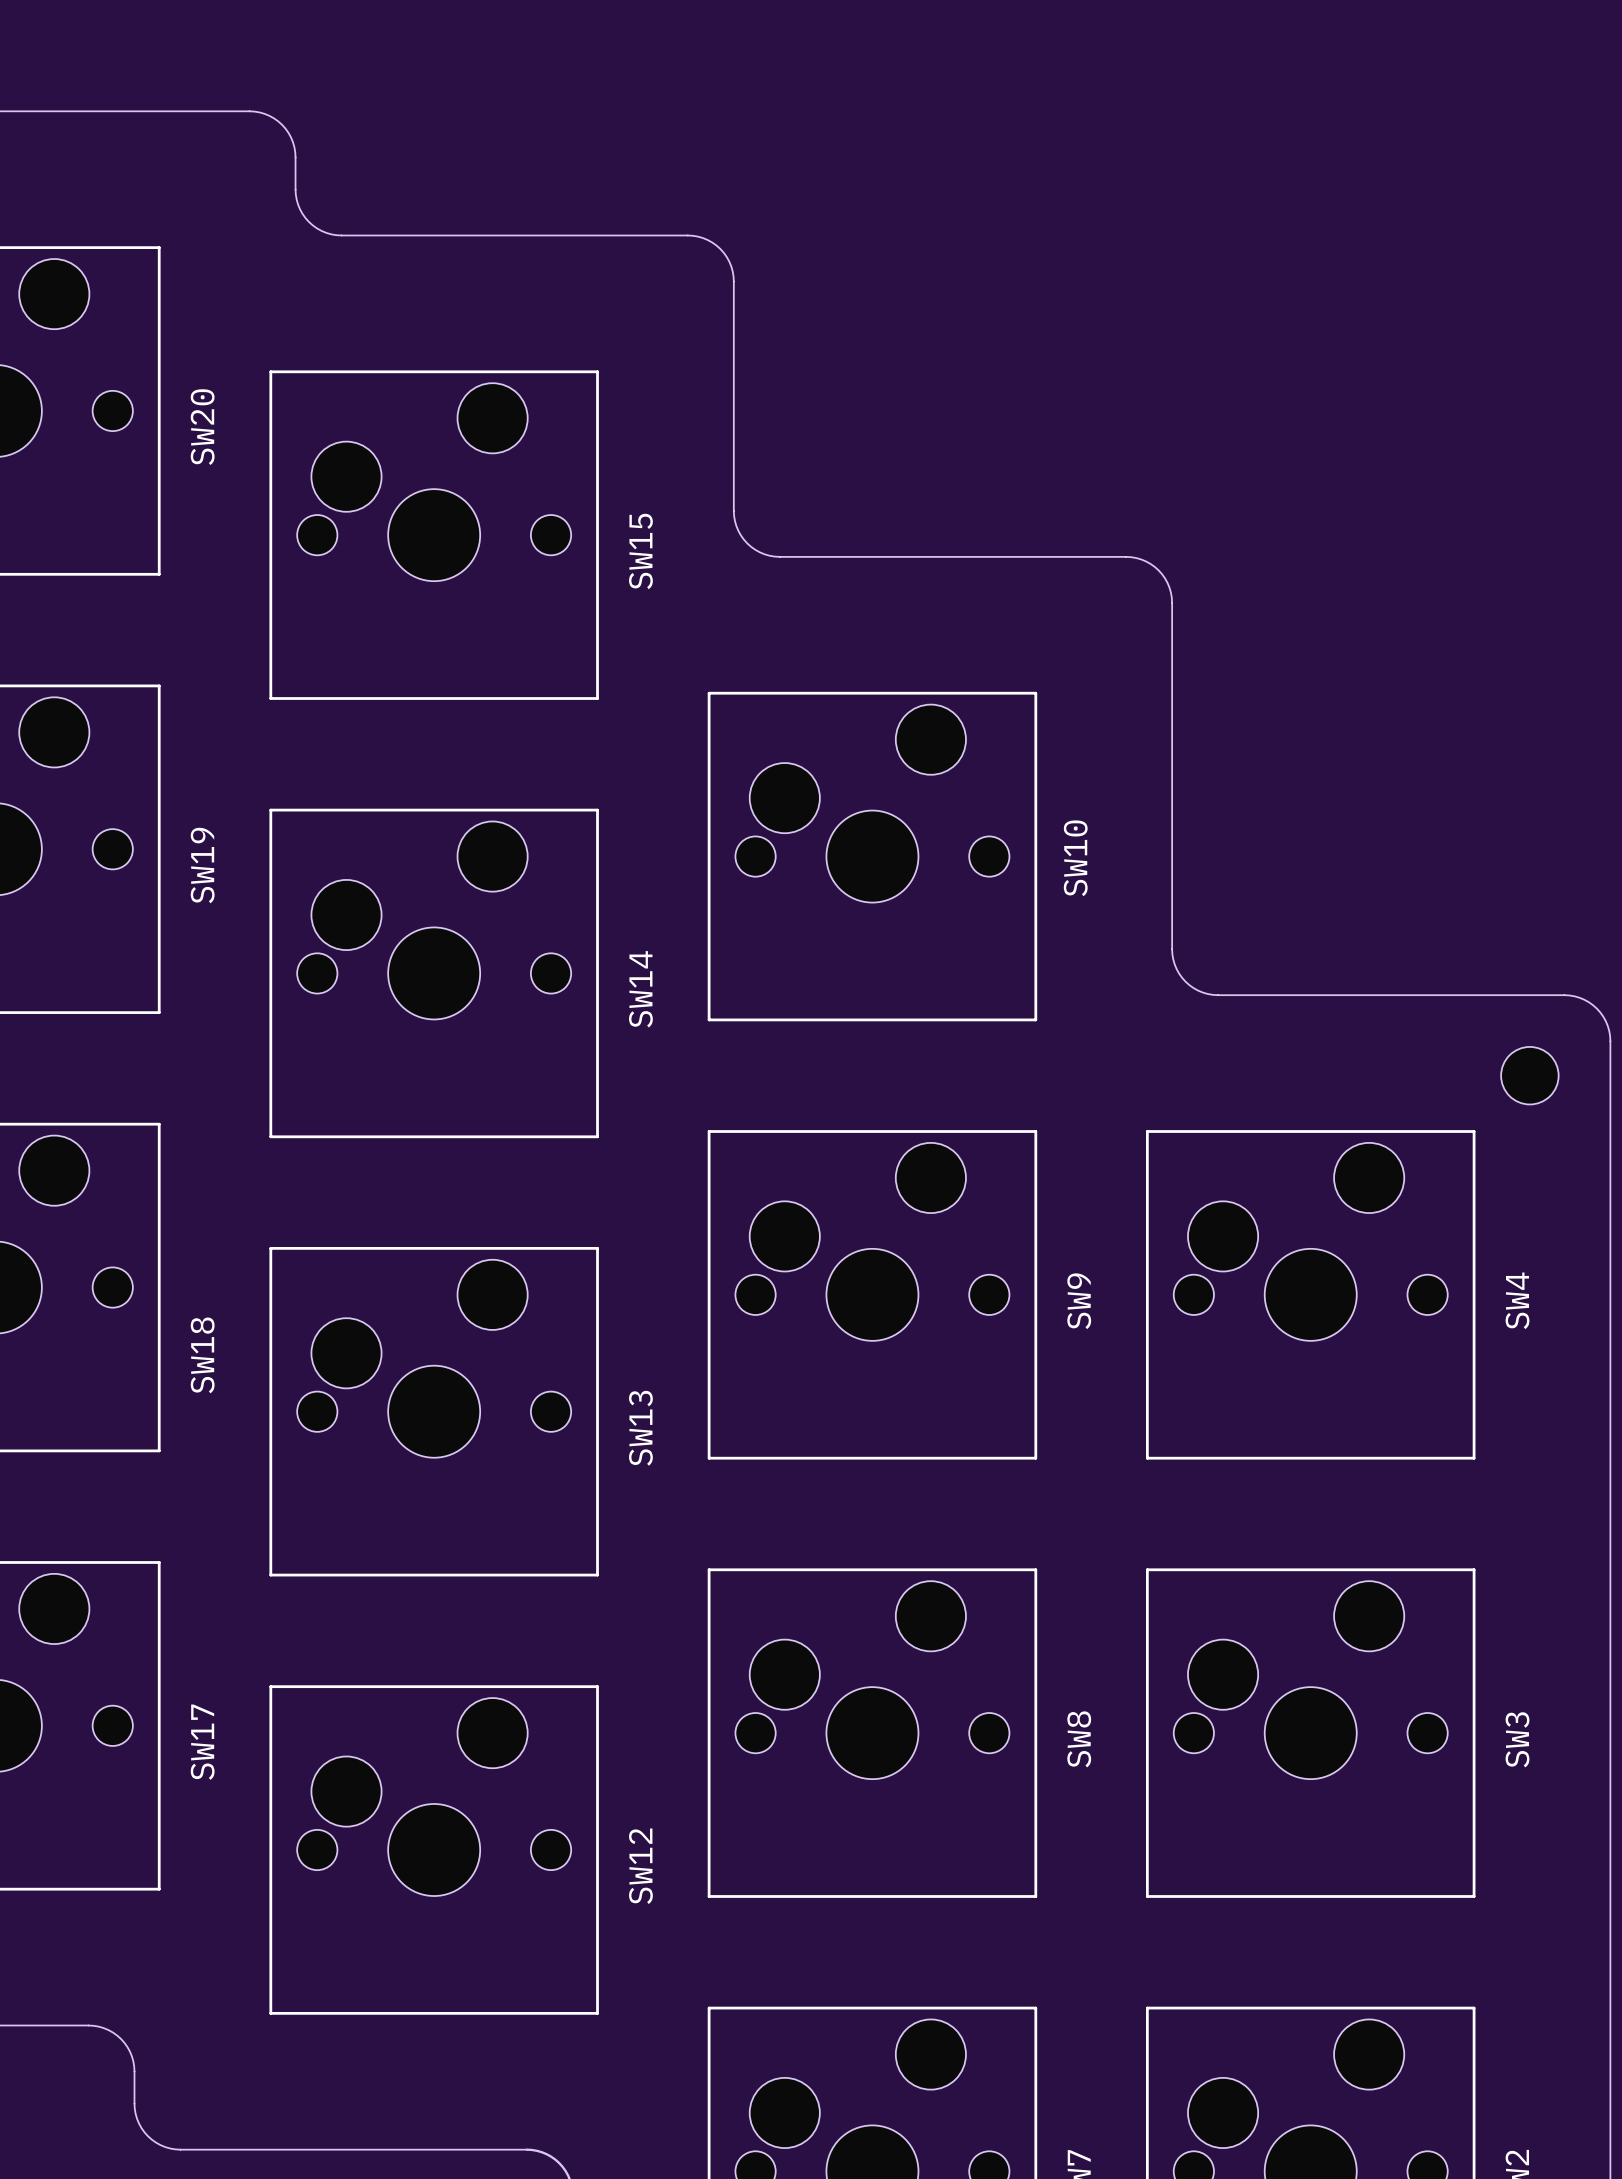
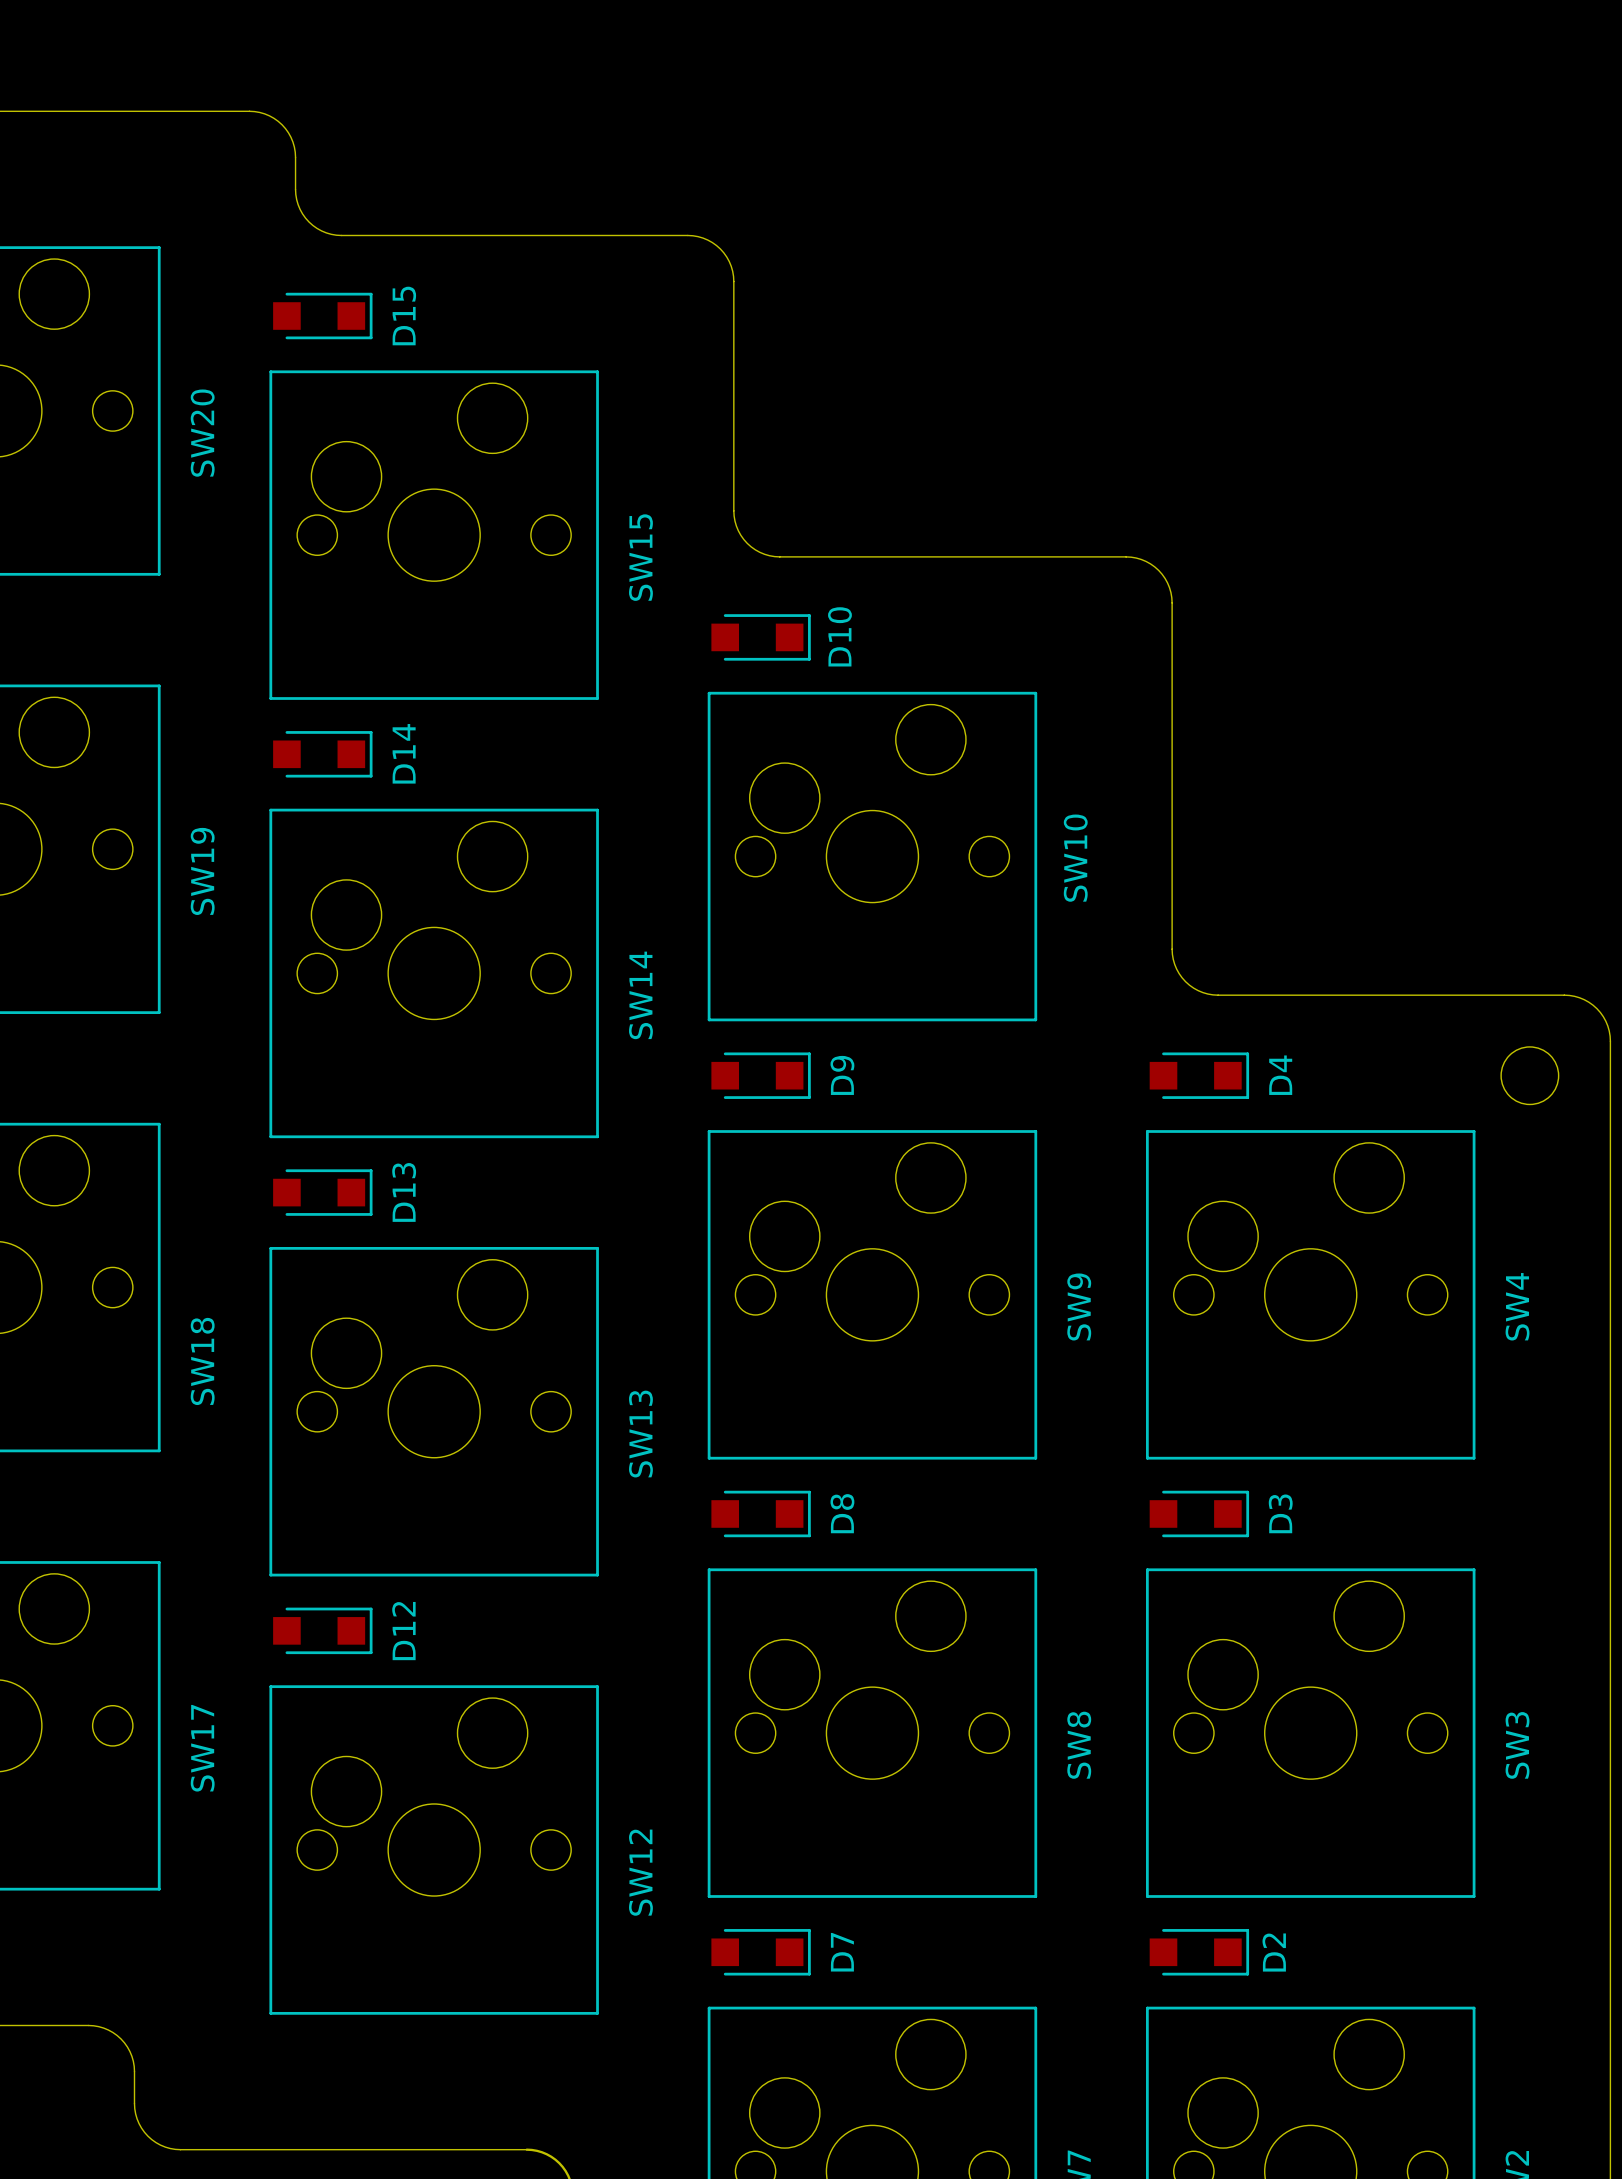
D15: none -> (322, 316)
D10: none -> (761, 637)
D14: none -> (322, 754)
D9: none -> (761, 1075)
D4: none -> (1199, 1075)
D13: none -> (322, 1192)
D8: none -> (761, 1513)
D3: none -> (1199, 1513)
D12: none -> (322, 1630)
D7: none -> (761, 1952)
D2: none -> (1199, 1952)

